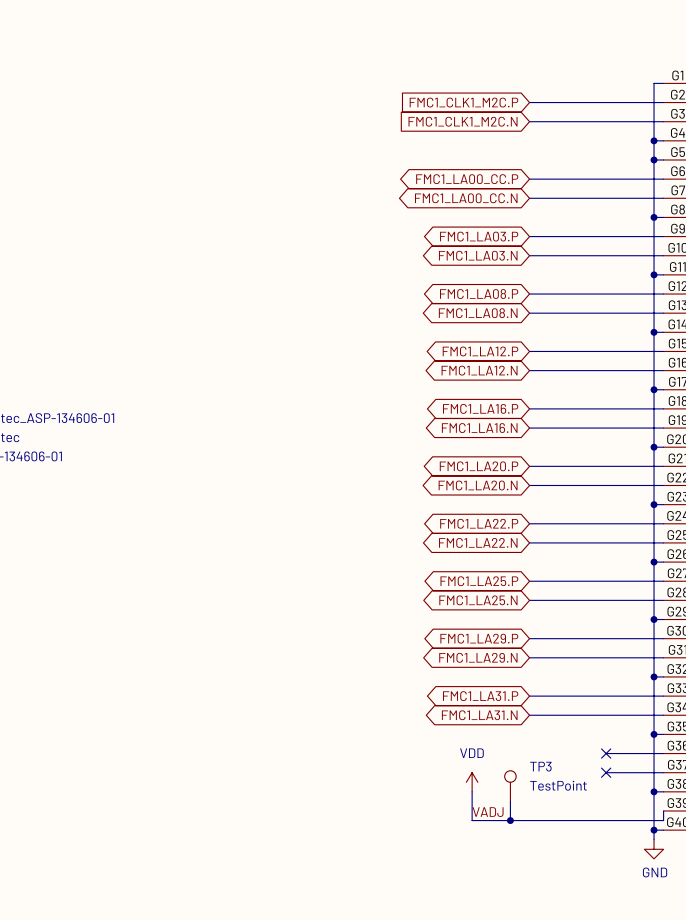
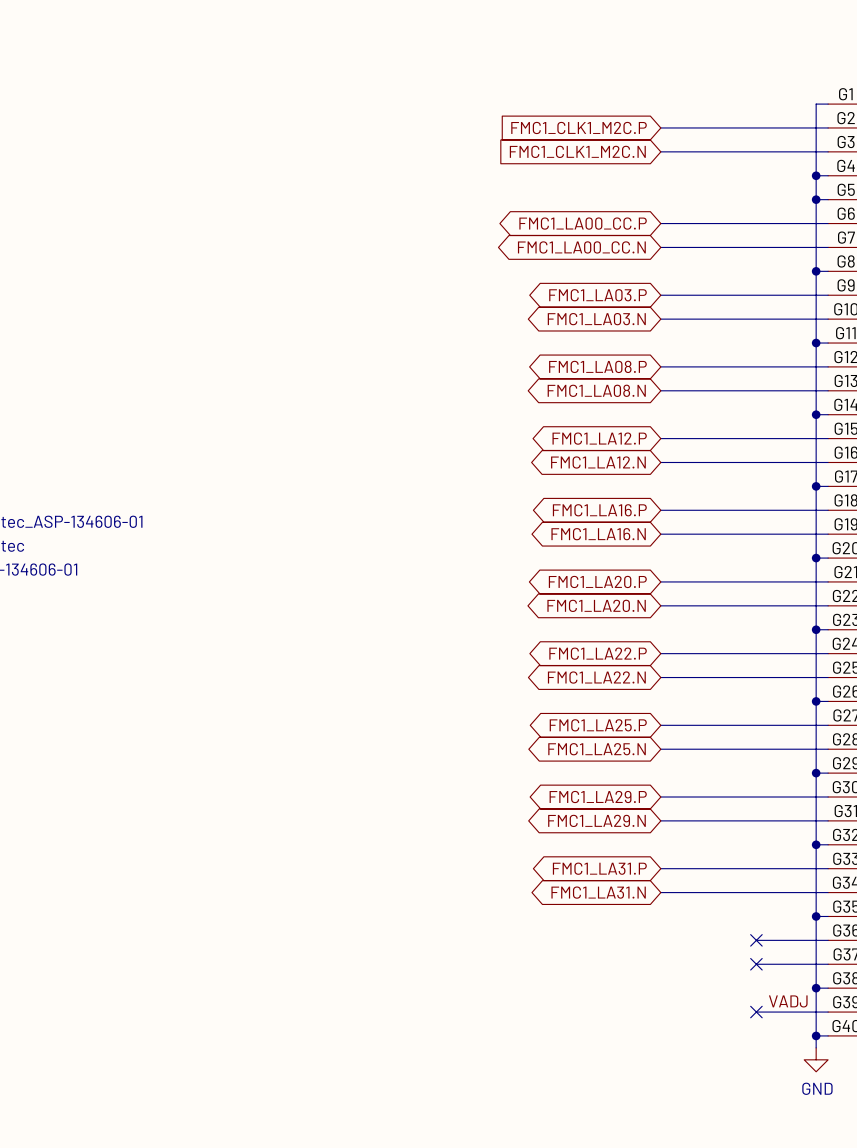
power symbol: VDD (472, 782) -> none
TP3: TestPoint (510, 786) -> none
wire: (472, 791) (472, 820) (663, 820) (663, 810) -> (756, 1012) (828, 1012)
wire: (510, 801) (510, 820) -> none
no-connect mark: none -> (756, 1012)
label position: VADJ (488, 812) -> VADJ (788, 1001)
junction: (510, 820) -> none

